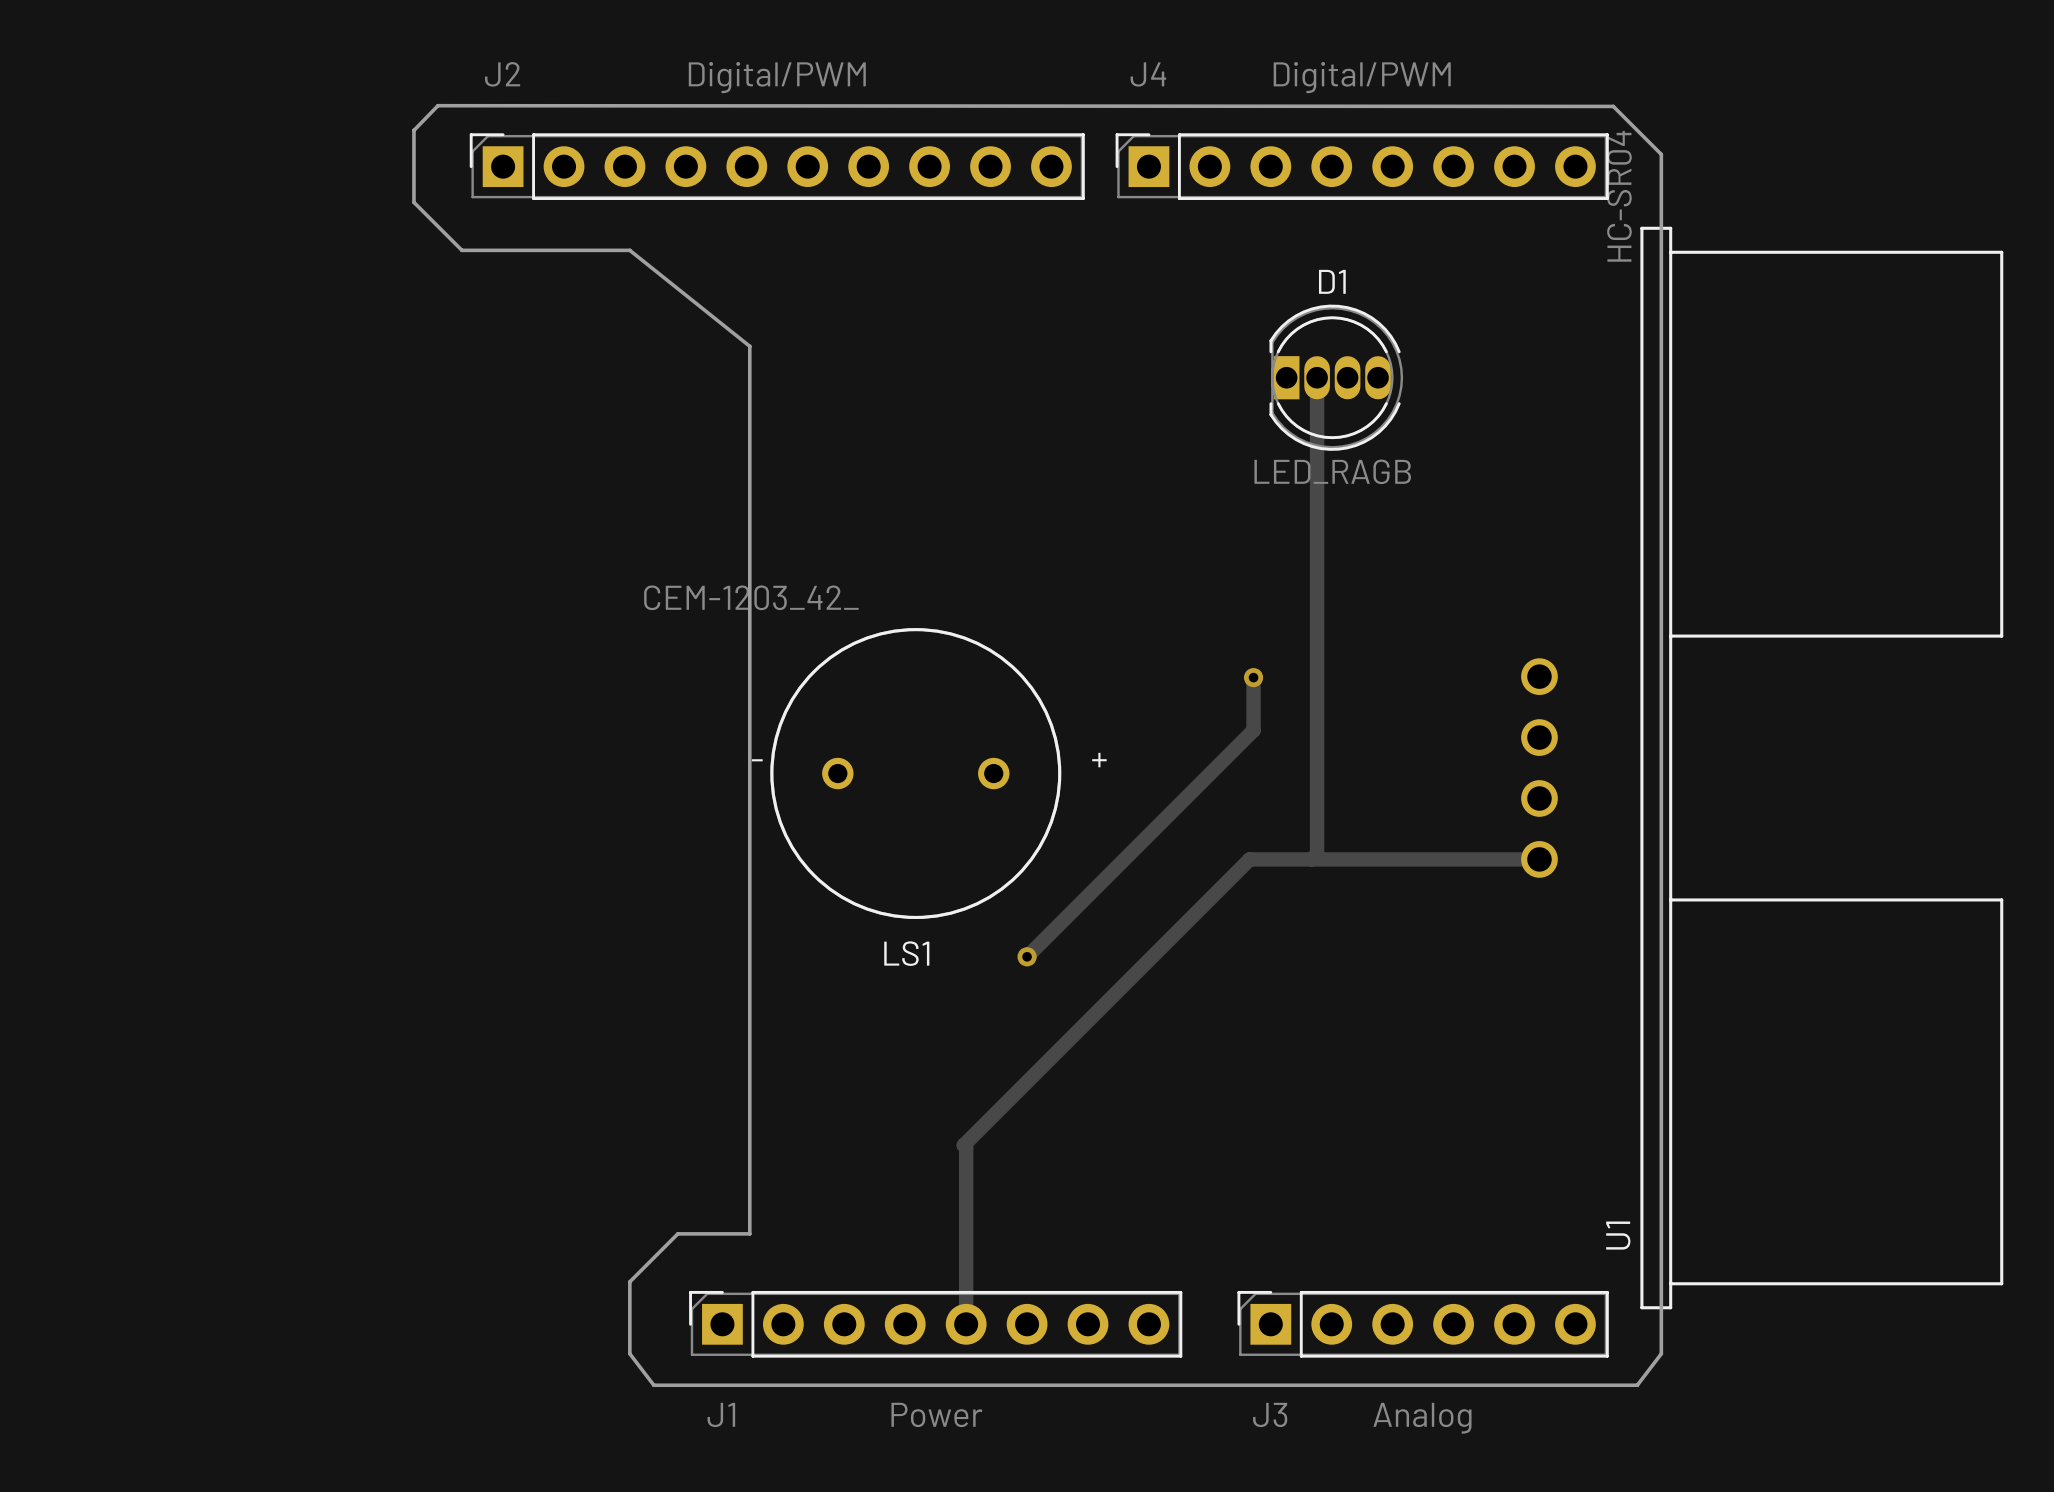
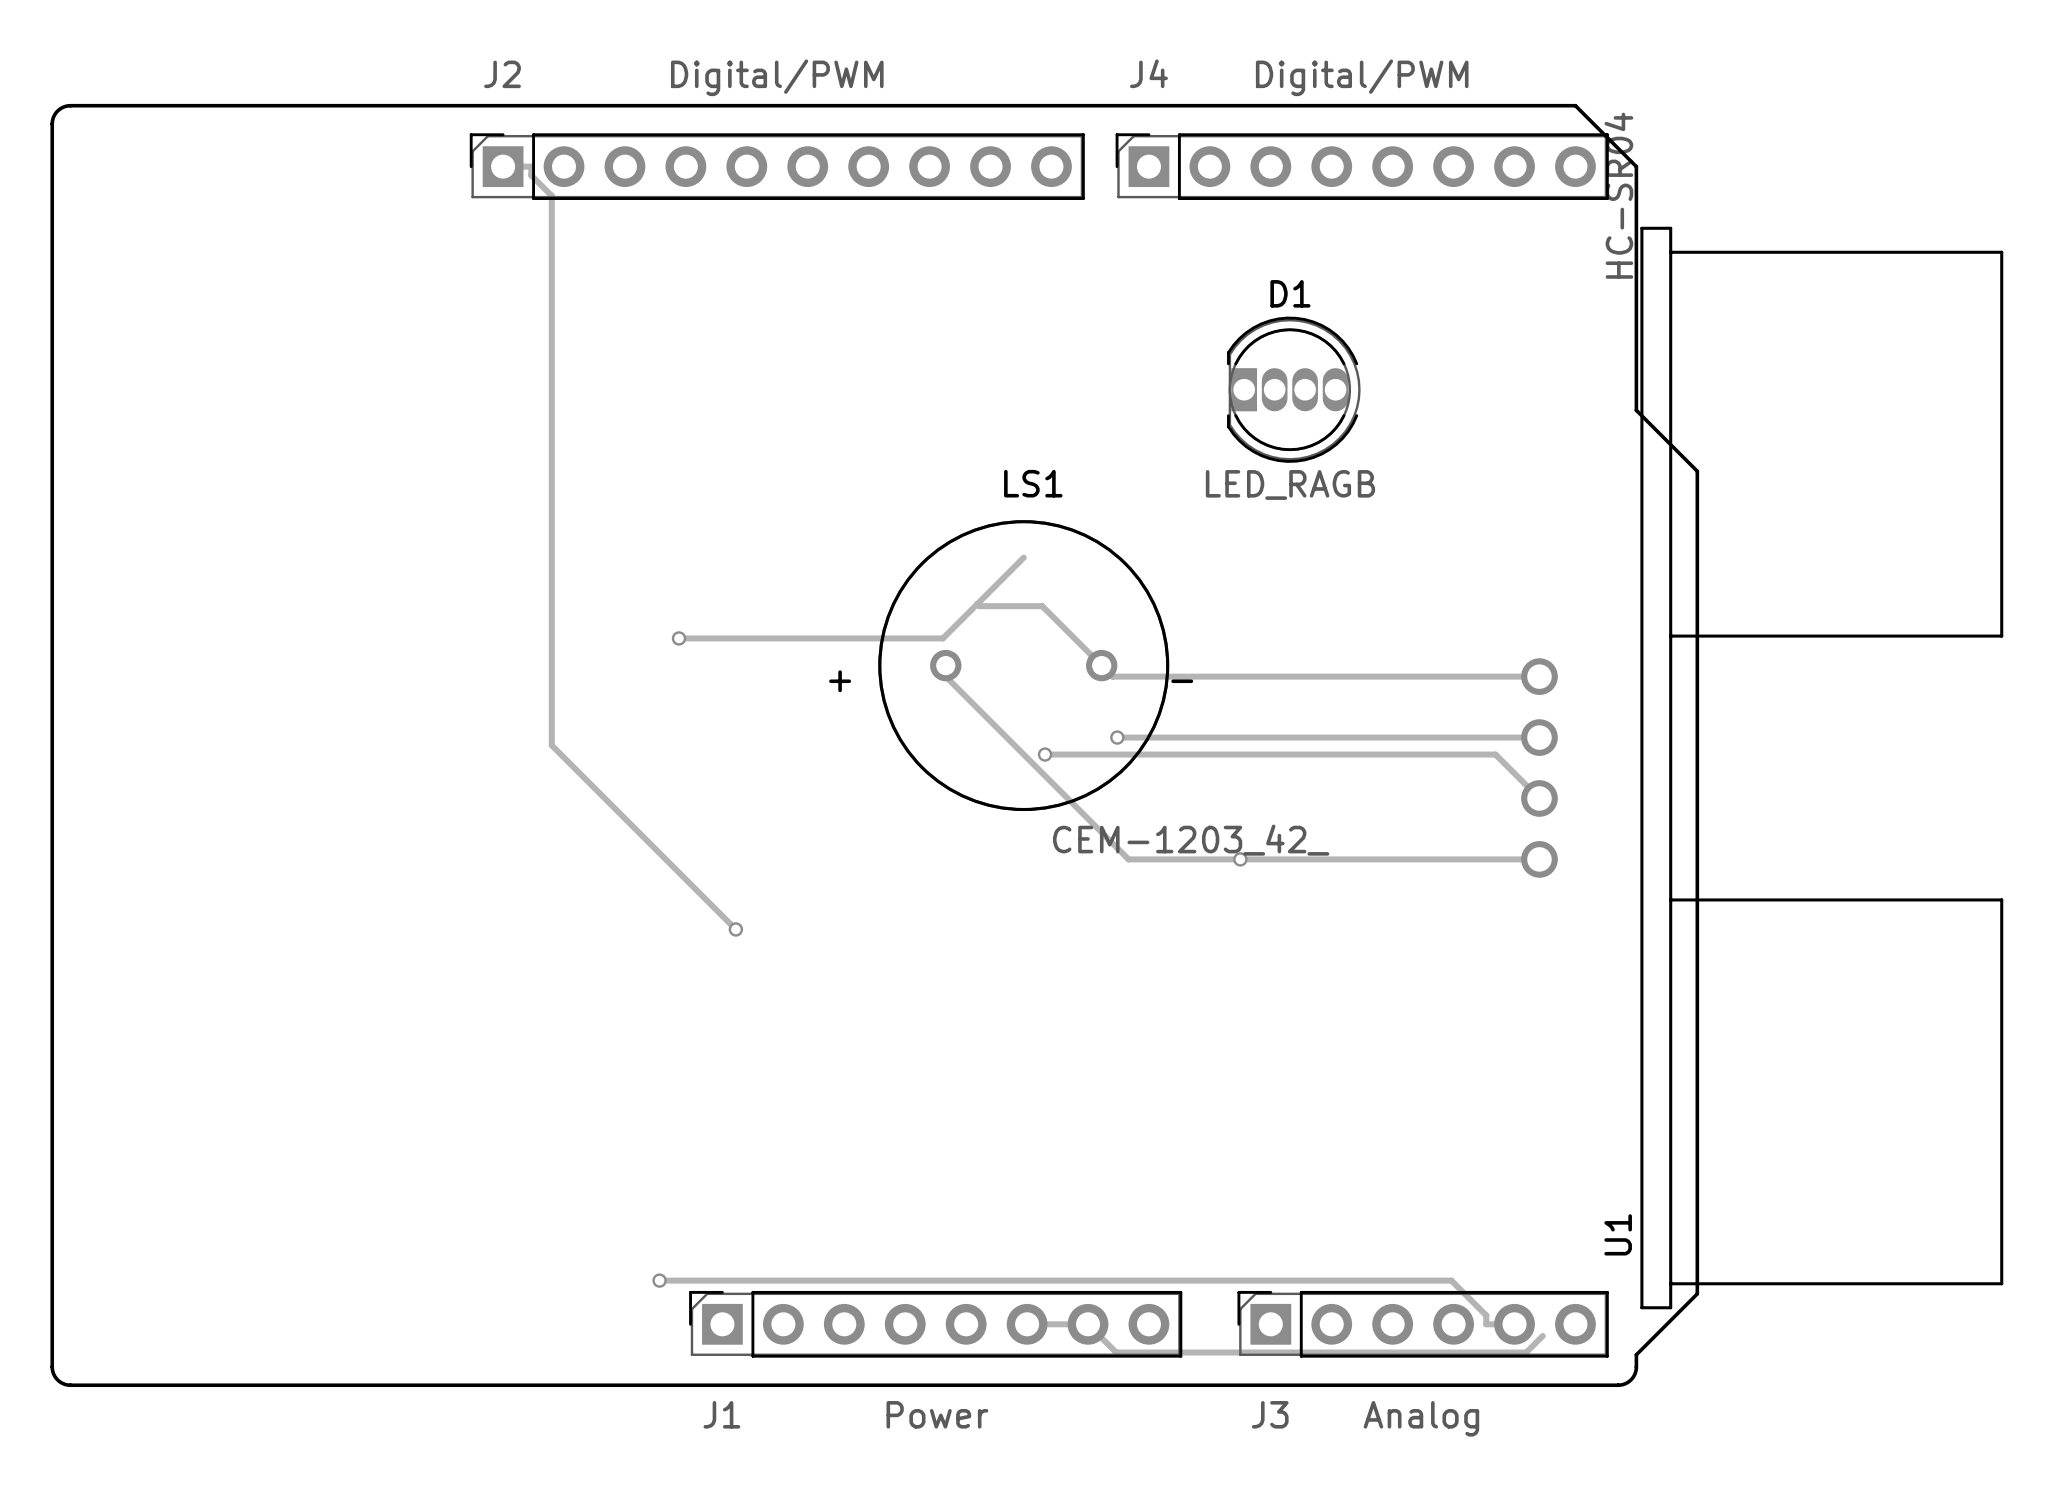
track: none -> (503, 166) (531, 166) (531, 175) (551, 195) (551, 745) (735, 929)
track: (1317, 377) (1317, 853) (1311, 859) -> none
D1 position: (1336, 377) -> (1293, 389)
track: none -> (1023, 557) (942, 638) (679, 638)
track: none -> (977, 603) (979, 606) (1042, 606) (1112, 676) (1539, 676)
via: none -> (679, 638)
track: (1253, 677) (1253, 730) (1027, 956) -> none
via: (1253, 677) -> none
track: none -> (1117, 737) (1539, 737)
via: none -> (1117, 737)
track: none -> (1045, 754) (1495, 754) (1539, 798)
via: none -> (1045, 754)
LS1 rotation: 0° (915, 773) -> 180° (1023, 665)
via: none -> (1240, 859)
track: (1249, 859) (963, 1145) (966, 1147) (966, 1324) -> (1249, 859) (1128, 859) (945, 676) (945, 665)
track width: thick (1249, 859) (1539, 859) -> thin (1249, 859) (1539, 859)
via: none -> (735, 929)
via: (1027, 956) -> none
track: none -> (659, 1280) (1451, 1280) (1486, 1315) (1486, 1324) (1514, 1324)
via: none -> (659, 1280)
track: none -> (1027, 1324) (1088, 1324) (1116, 1352) (1526, 1352) (1542, 1335)
board edge: (653, 1385) (629, 1353) (629, 1281) (677, 1233) (749, 1233) (749, 346) (629, 250) (461, 250) (413, 202) (413, 130) (437, 105) (1613, 106) (1661, 154) (1661, 1353) (1637, 1385) (1618, 1385) -> (653, 1385) (70, 1385) (61, 1382) (53, 1373) (52, 123) (54, 114) (63, 107) (1575, 105) (1636, 166) (1636, 410) (1697, 471) (1697, 1293) (1636, 1354) (1636, 1369) (1632, 1378) (1627, 1382) (1618, 1385)

